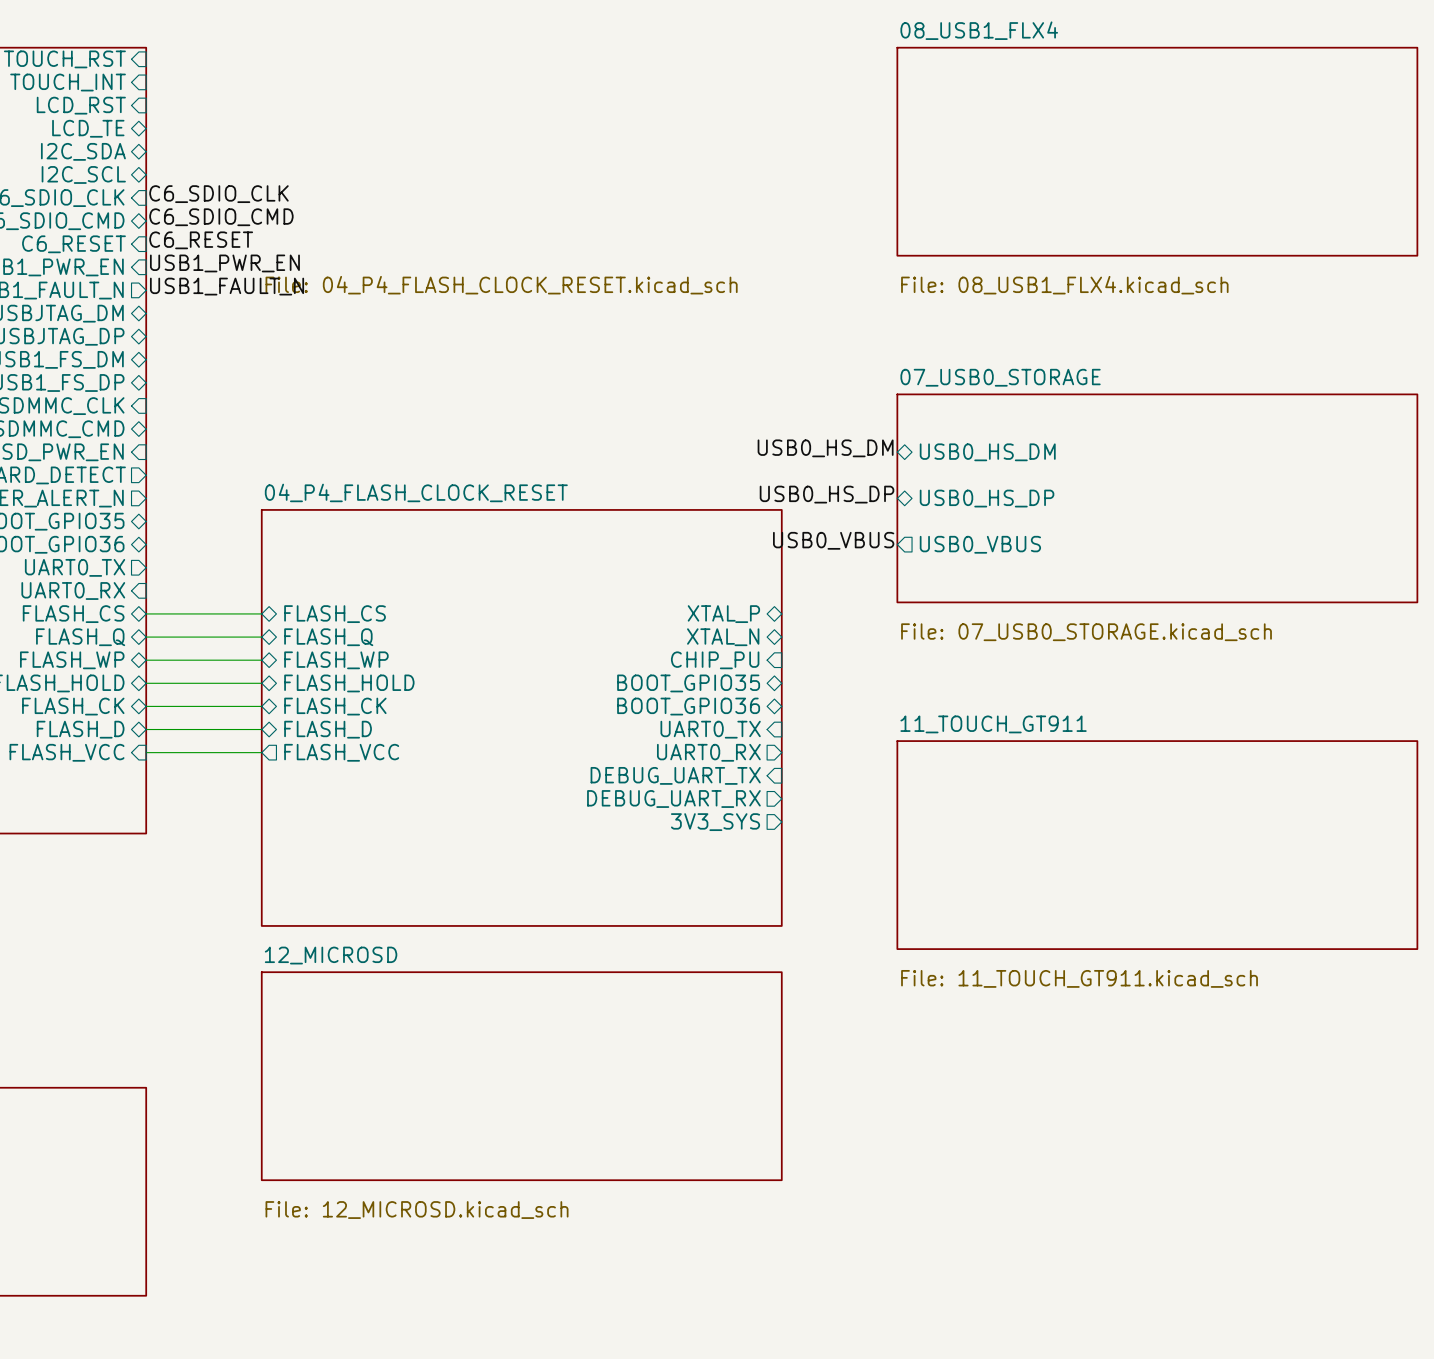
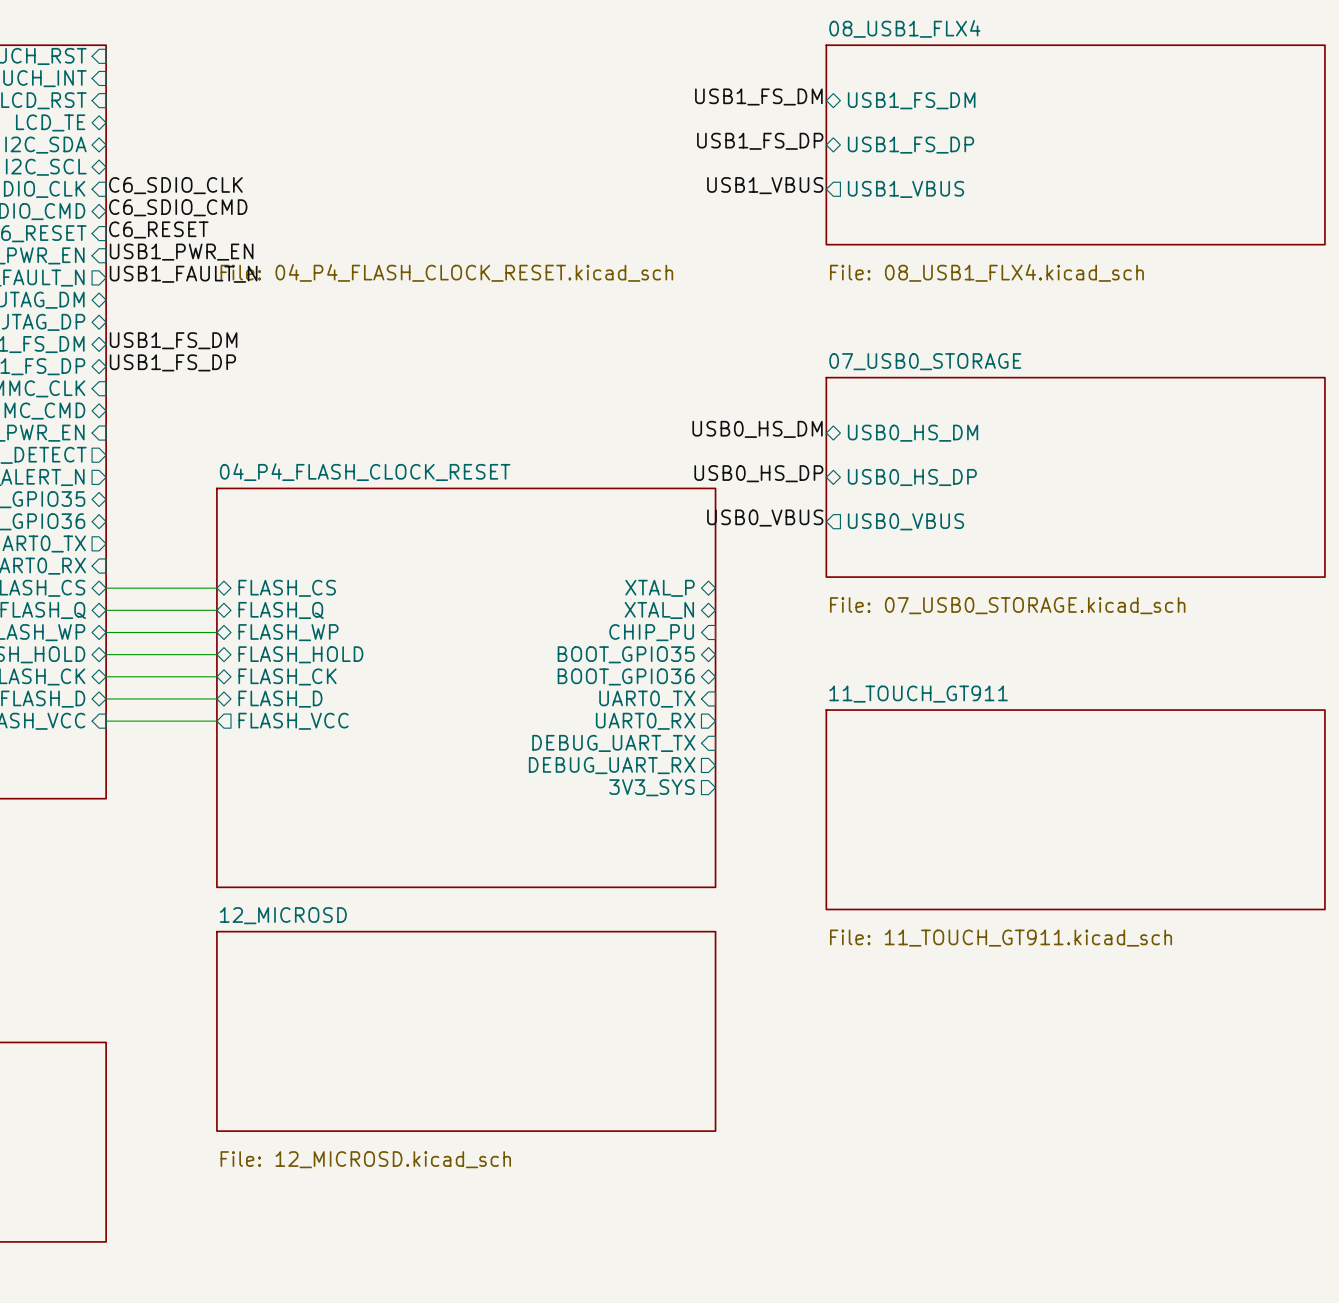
label: none -> USB1_FS_DM (758, 96)
sheet pin: none -> USB1_FS_DM (911, 100)
label: none -> USB1_FS_DP (760, 141)
sheet pin: none -> USB1_FS_DP (910, 145)
label: none -> USB1_VBUS (765, 185)
sheet pin: none -> USB1_VBUS (905, 189)
label: none -> USB1_FS_DM (173, 340)
label: none -> USB1_FS_DP (172, 362)

